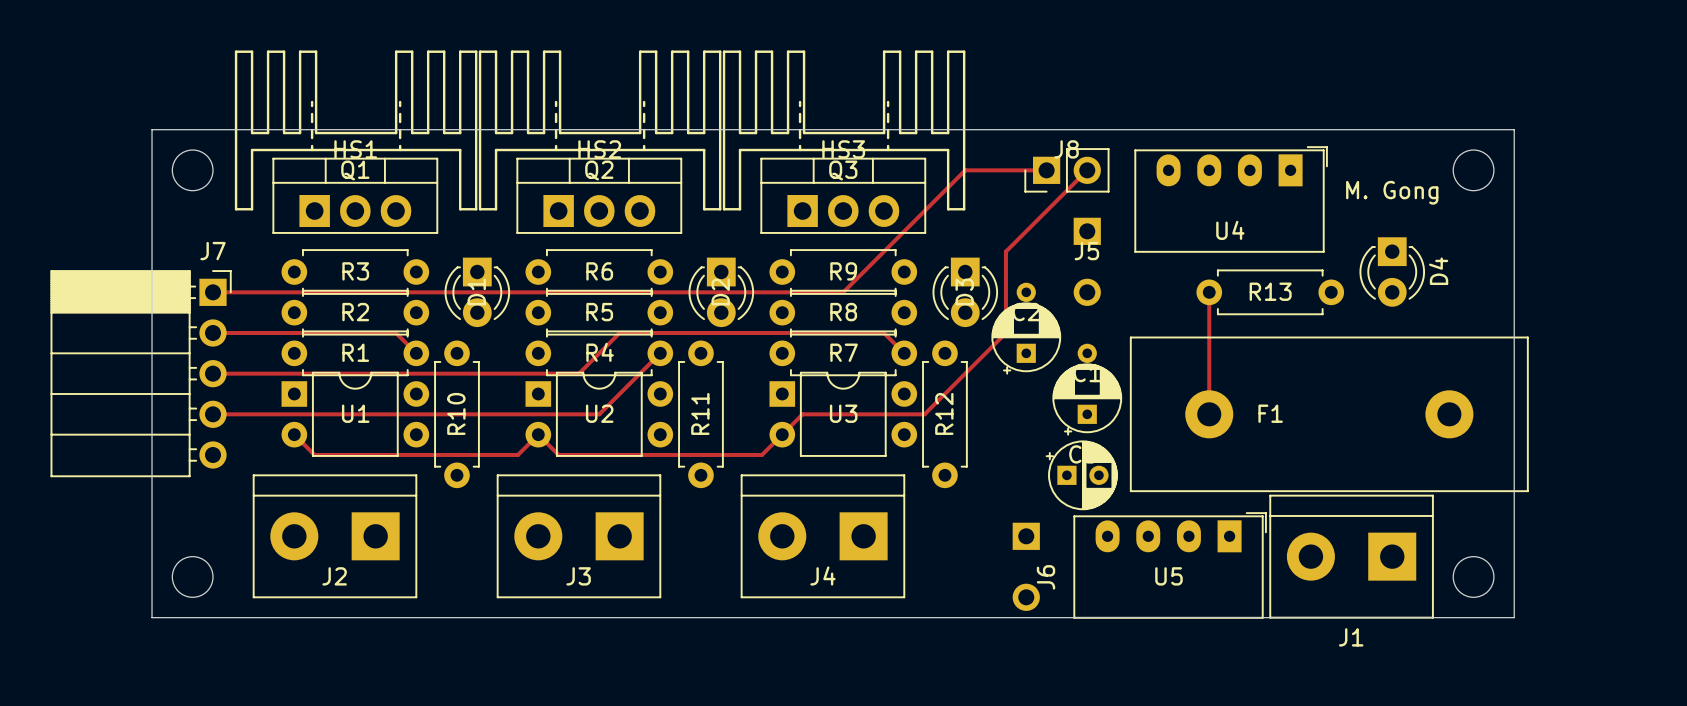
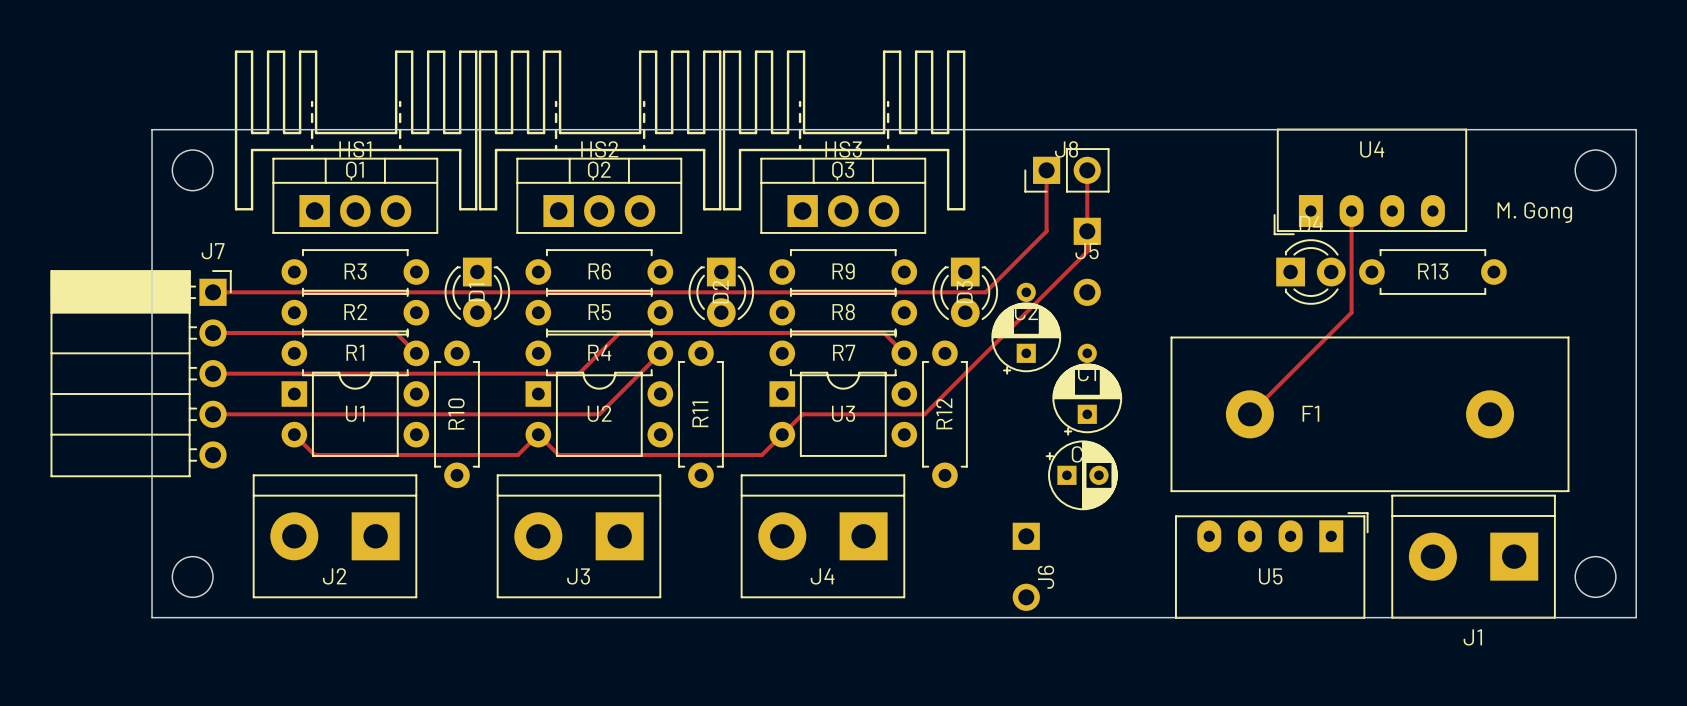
board edge: (1514, 129) (1514, 617) -> (1514, 129) (1636, 129) (1636, 617) (1514, 617)
track: (1046, 170) (965, 170) (843, 292) -> (1046, 170) (1046, 231) (985, 292) (843, 292)
track: (1087, 170) (1005, 251) (1005, 333) -> (1087, 170) (1087, 251) (1005, 333)
round board edge position: (1473, 170) -> (1595, 170)
text position: M. Gong (1392, 192) -> M. Gong (1534, 212)
U4 rotation: 0° (1231, 199) -> 180° (1370, 181)
U4 position: (1231, 199) -> (1370, 181)
track: none -> (1351, 211) (1351, 312) (1249, 414)
D4 rotation: 0° (1392, 272) -> 90° counterclockwise (1310, 272)
D4 position: (1392, 272) -> (1310, 272)
track: (1209, 292) (1209, 414) -> none
R13 position: (1270, 292) -> (1432, 272)
F1 position: (1329, 414) -> (1369, 414)
J1 position: (1351, 556) -> (1473, 556)
U5 position: (1170, 565) -> (1271, 565)
round board edge position: (1473, 576) -> (1595, 576)

